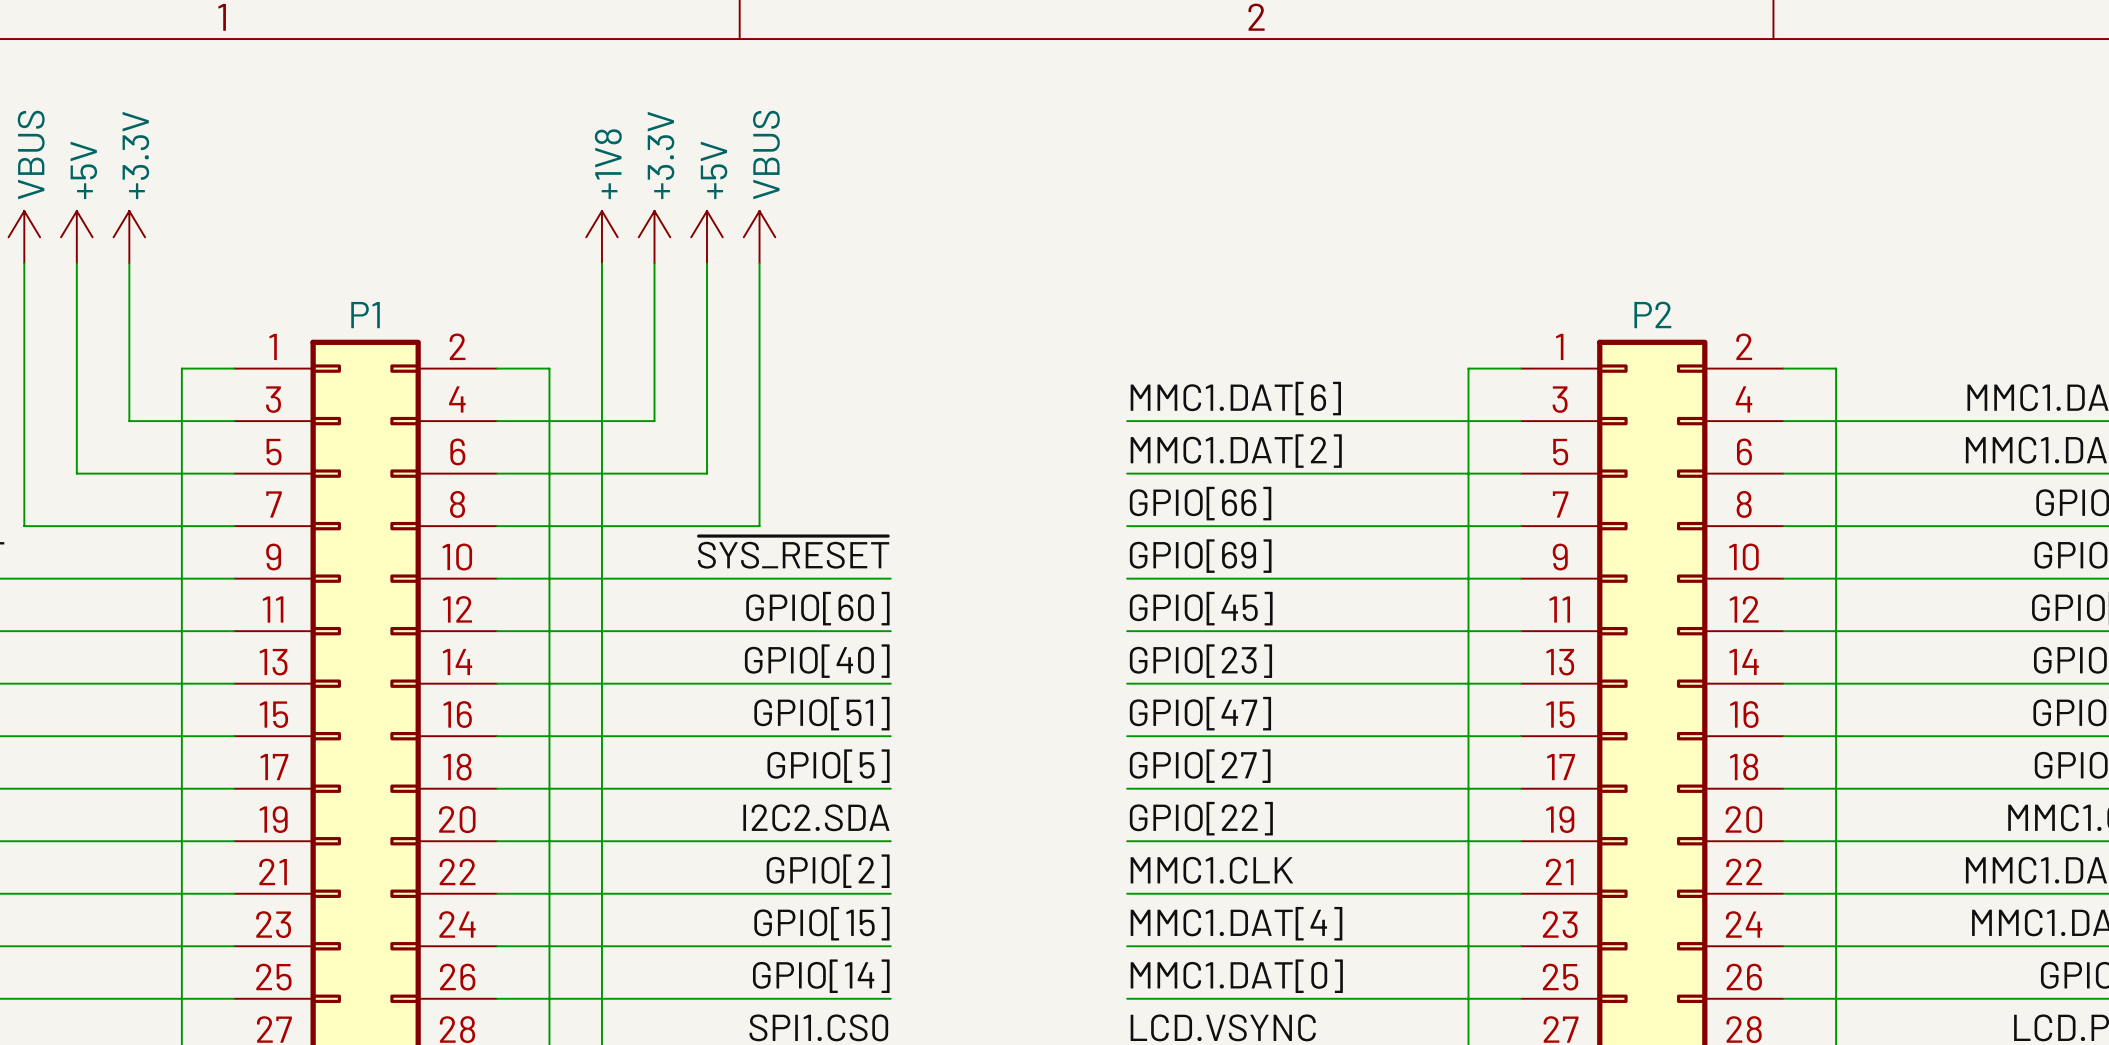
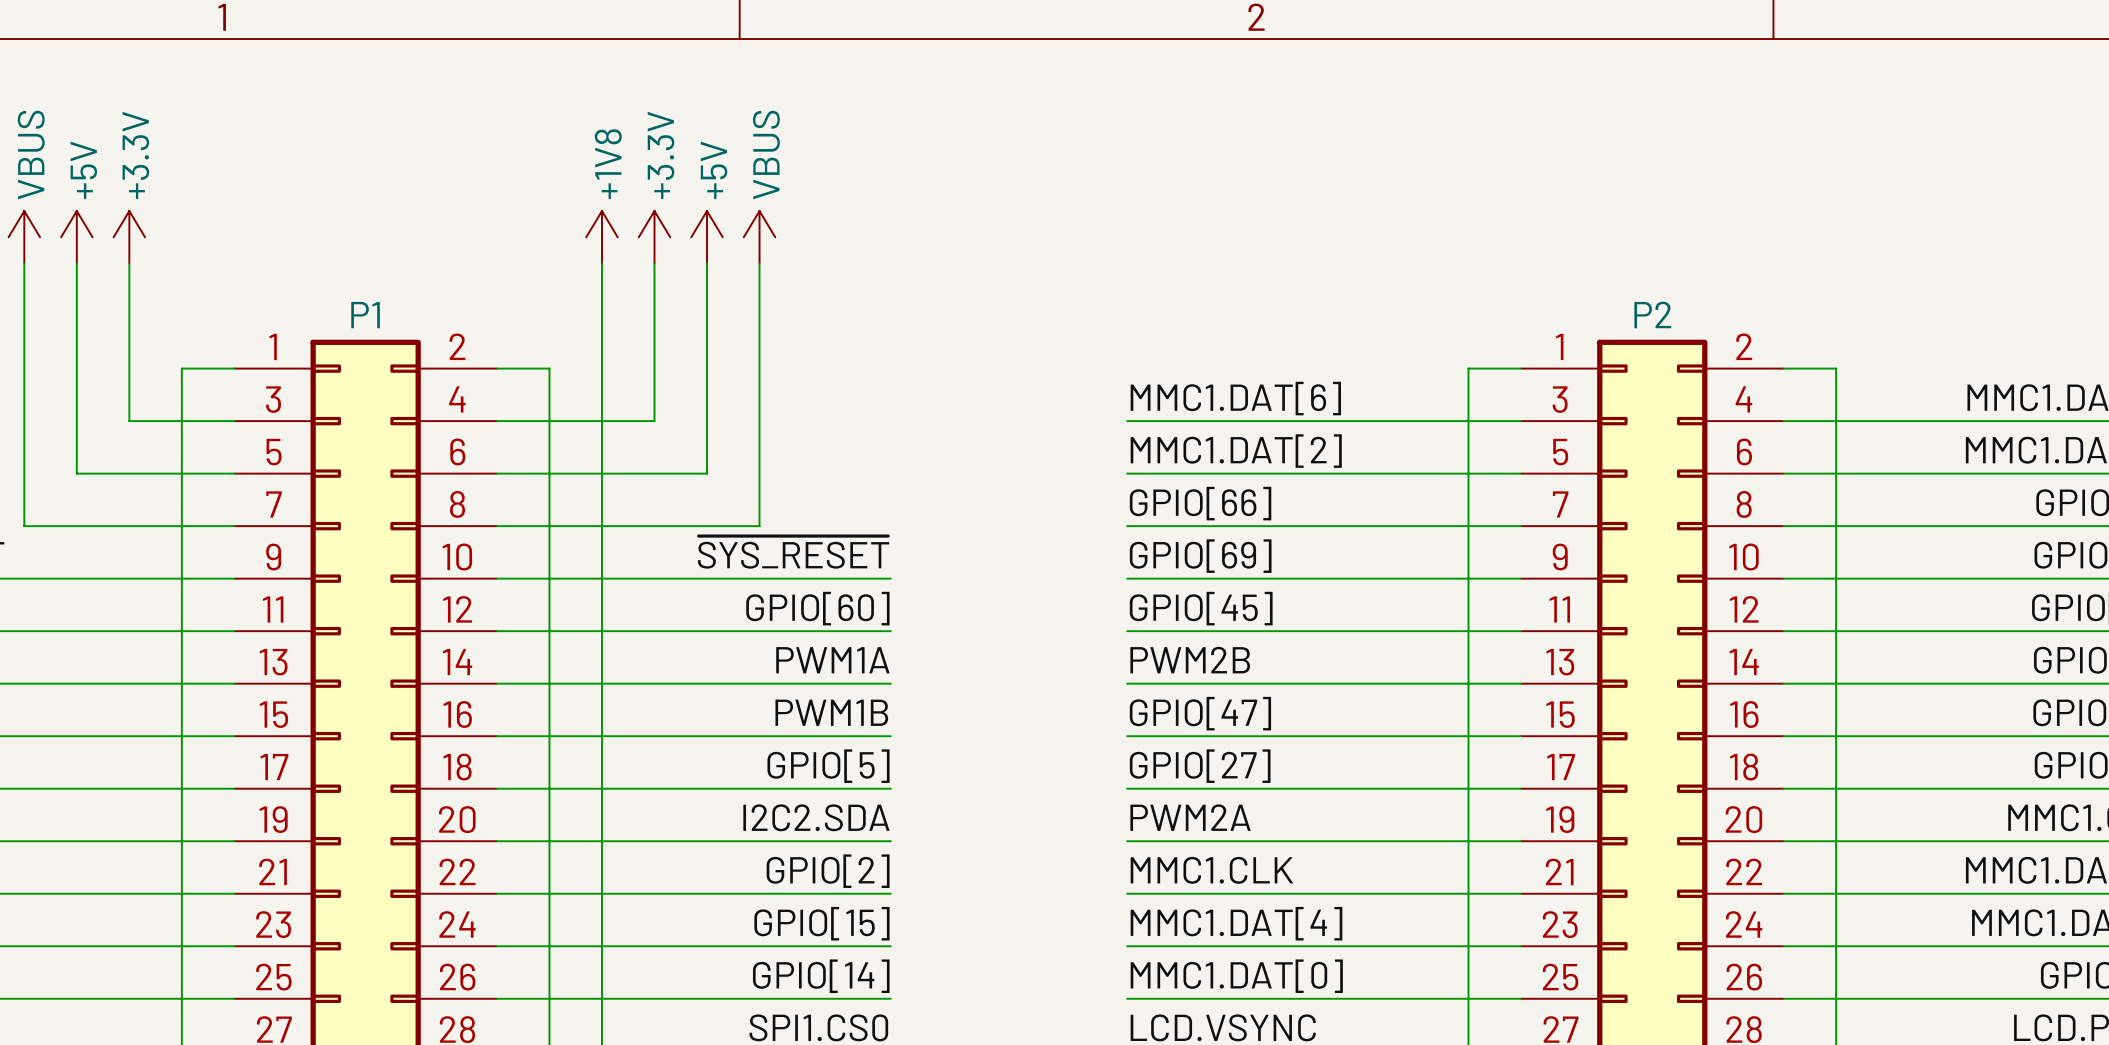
label: GPIO[40] (817, 661) -> PWM1A (832, 660)
label: GPIO[23] (1200, 661) -> PWM2B (1190, 660)
label: GPIO[51] (821, 713) -> PWM1B (831, 712)
label: GPIO[22] (1201, 818) -> PWM2A (1190, 817)

